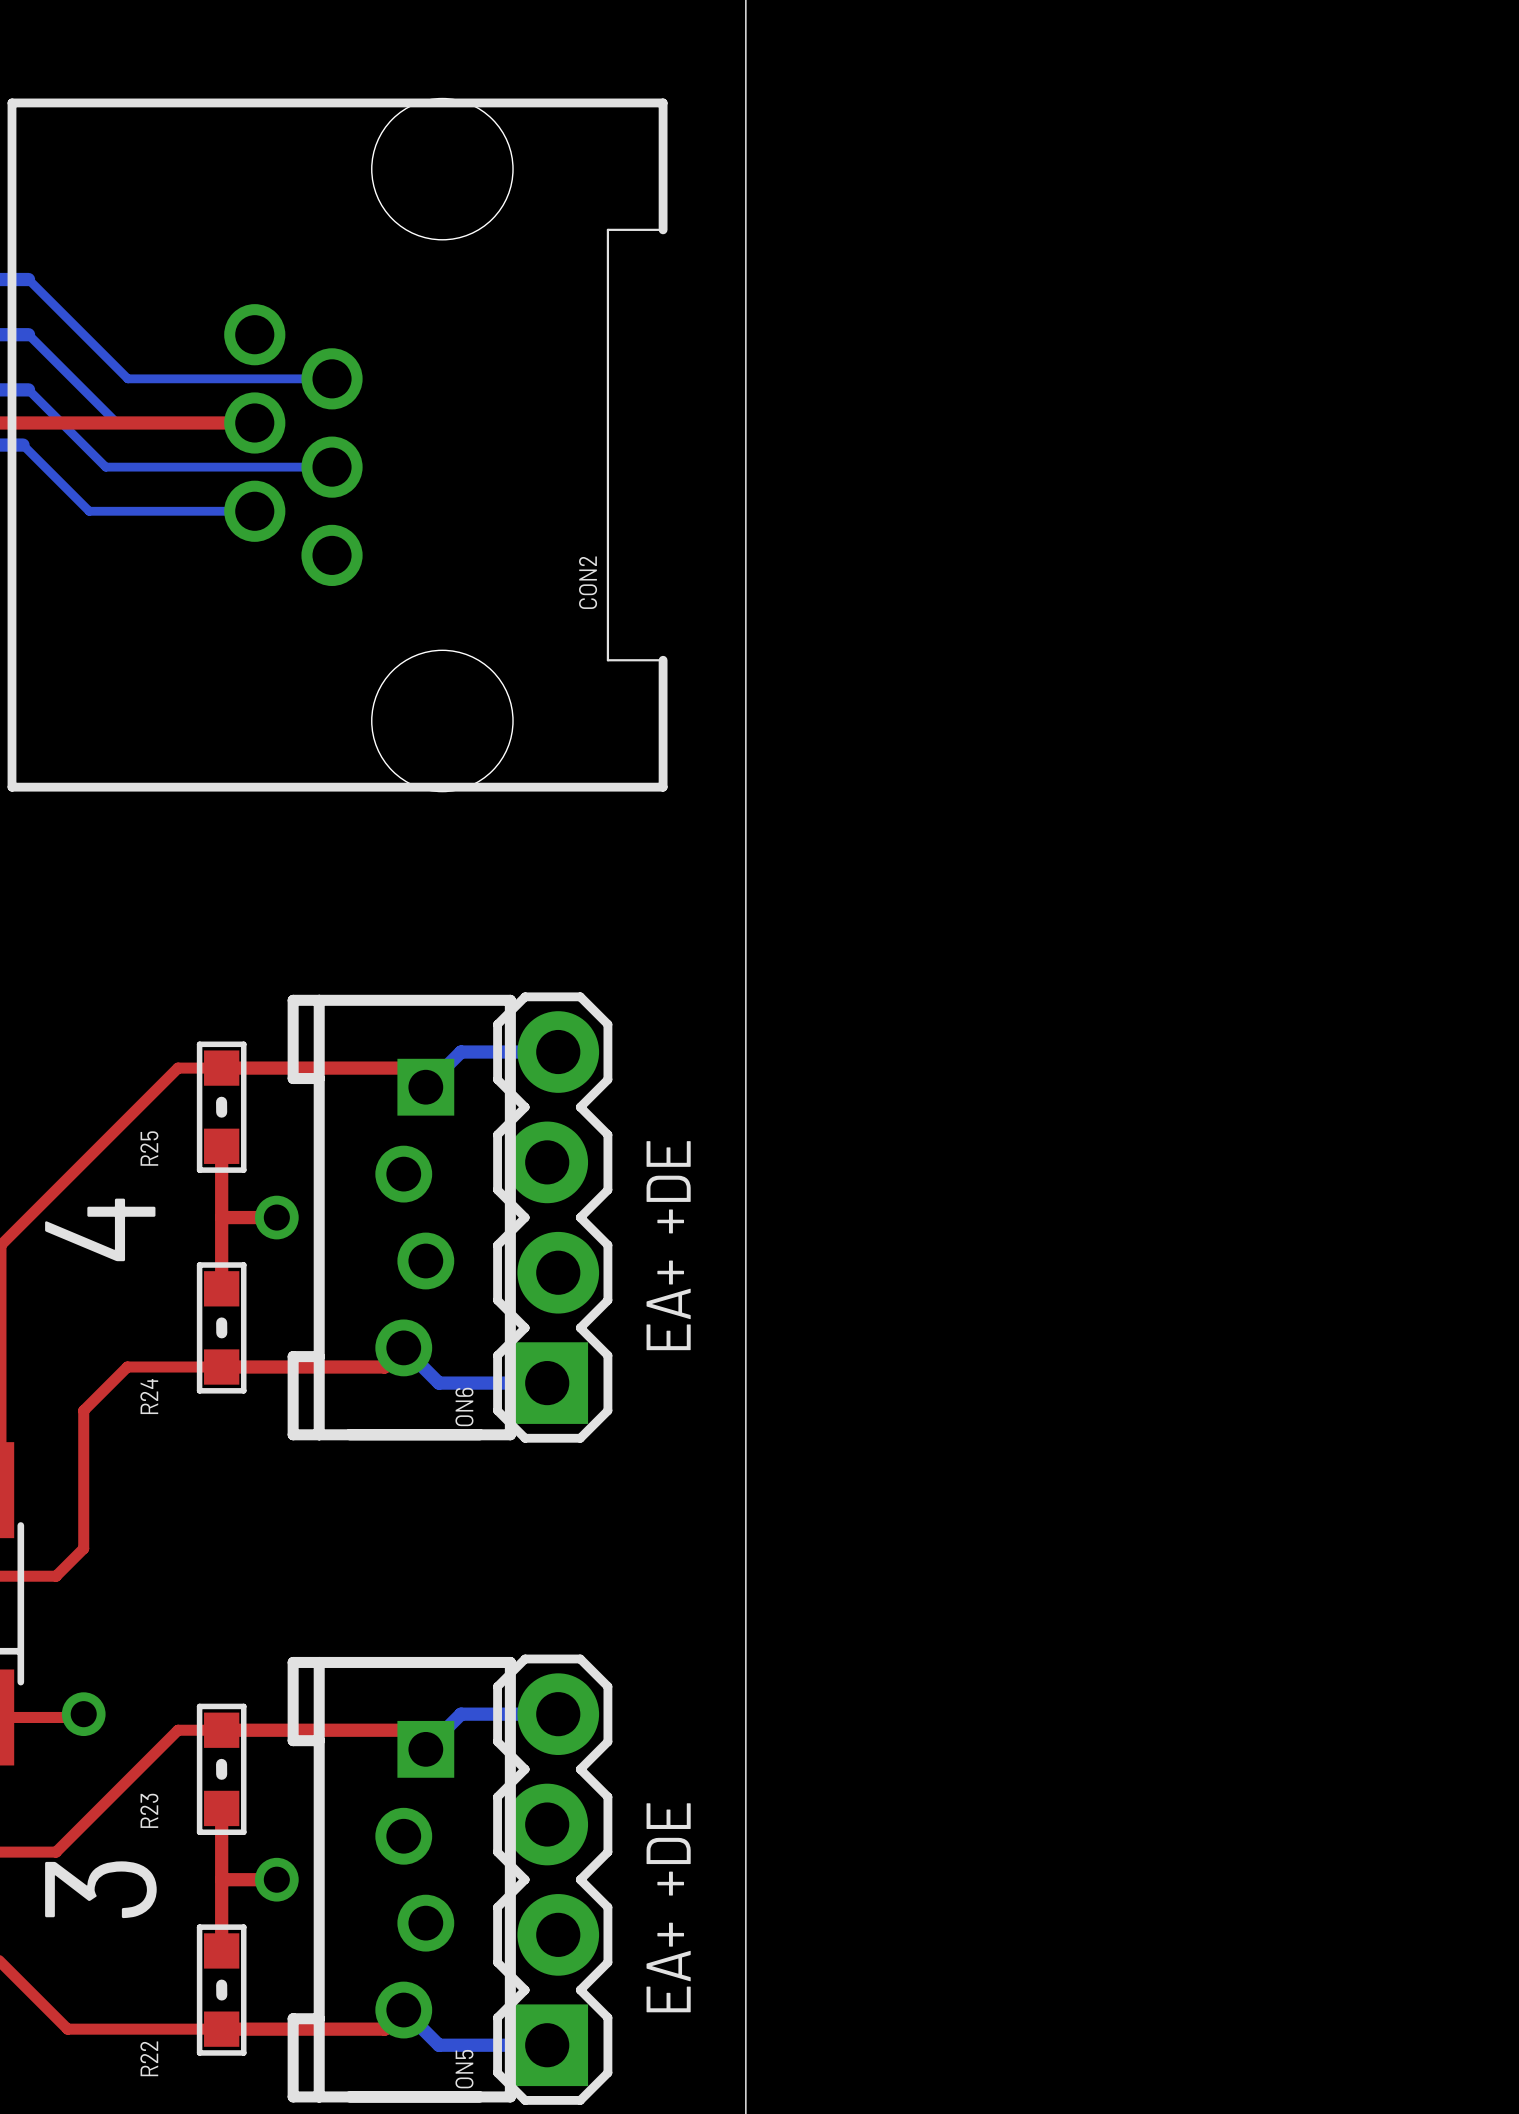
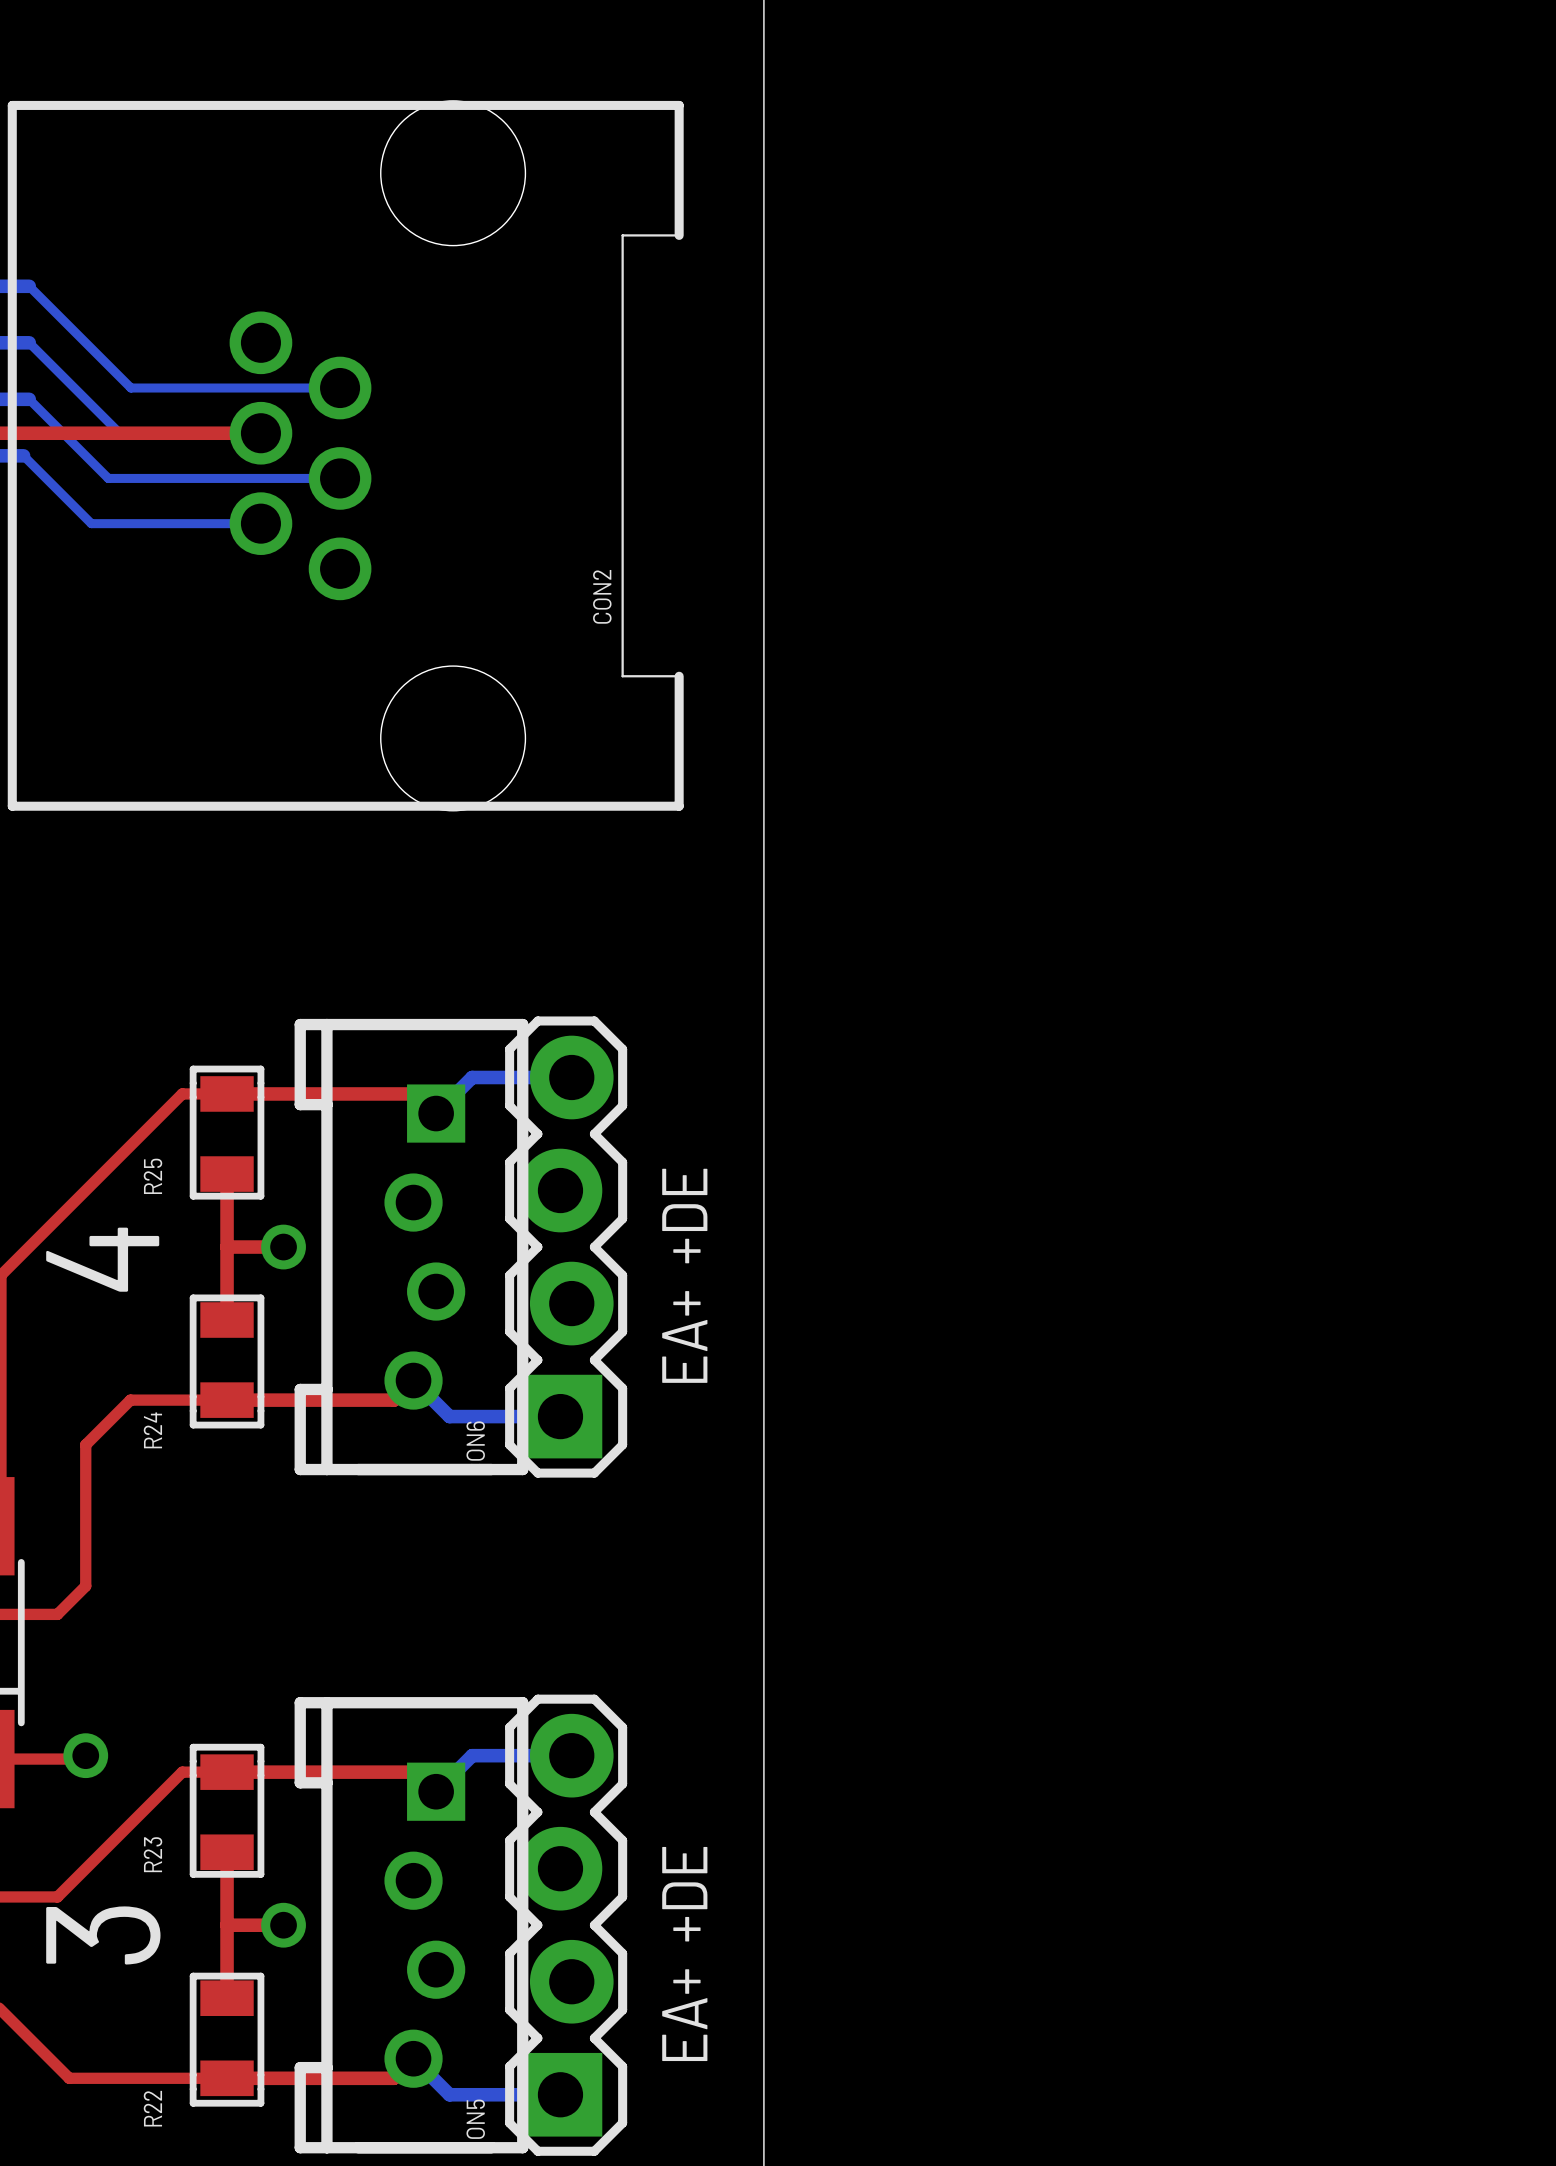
R25 footprint: [196, 1041, 247, 1173] -> [189, 1065, 265, 1200]
R24 footprint: [196, 1262, 247, 1394] -> [189, 1294, 265, 1429]
R23 footprint: [196, 1703, 247, 1836] -> [189, 1743, 265, 1878]
R22 footprint: [196, 1924, 247, 2056] -> [189, 1972, 265, 2107]

